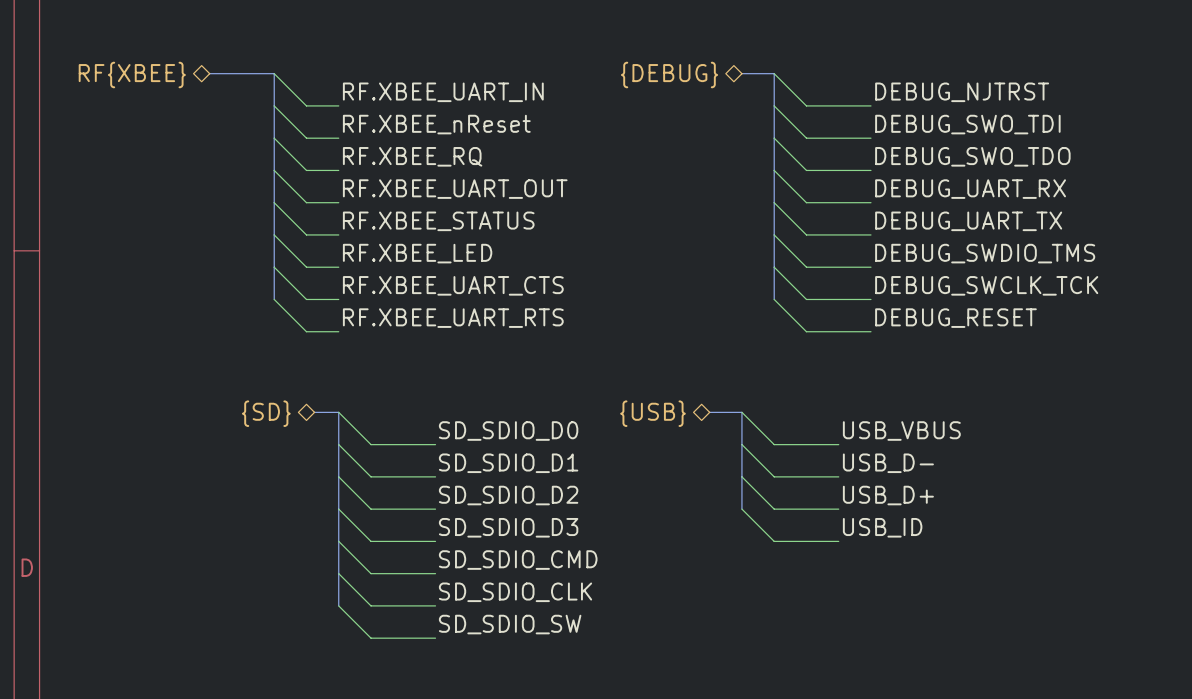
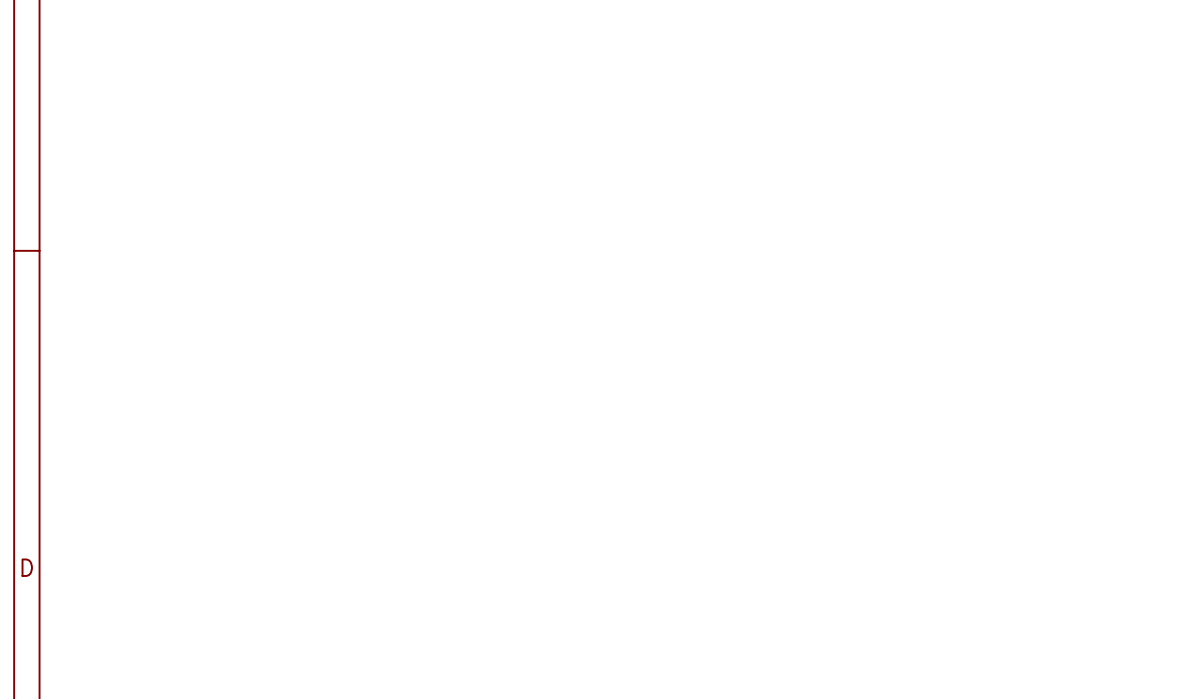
bus: (209, 73) (274, 73) (274, 299) -> none
wire: (274, 73) (306, 105) (338, 105) -> none
bus: (741, 73) (774, 73) (774, 299) -> none
wire: (774, 73) (806, 105) (870, 105) -> none
hierarchical label: RF{XBEE} (132, 74) -> none
hierarchical label: {DEBUG} (669, 74) -> none
label: RF.XBEE_UART_IN (443, 92) -> none
label: DEBUG_NJTRST (962, 92) -> none
wire: (274, 105) (306, 138) (338, 138) -> none
wire: (774, 105) (806, 138) (870, 138) -> none
label: RF.XBEE_nReset (436, 124) -> none
label: DEBUG_SWO_TDI (967, 124) -> none
wire: (274, 138) (306, 170) (338, 170) -> none
wire: (774, 138) (806, 170) (870, 170) -> none
label: RF.XBEE_RQ (412, 156) -> none
label: DEBUG_SWO_TDO (972, 156) -> none
wire: (274, 170) (306, 202) (338, 202) -> none
wire: (774, 170) (806, 202) (870, 202) -> none
label: RF.XBEE_UART_OUT (455, 189) -> none
label: DEBUG_UART_RX (970, 189) -> none
wire: (274, 202) (306, 234) (338, 234) -> none
wire: (774, 202) (806, 234) (870, 234) -> none
label: RF.XBEE_STATUS (438, 221) -> none
label: DEBUG_UART_TX (968, 221) -> none
wire: (274, 234) (306, 267) (338, 267) -> none
wire: (774, 234) (806, 267) (870, 267) -> none
label: RF.XBEE_LED (417, 253) -> none
label: DEBUG_SWDIO_TMS (985, 253) -> none
wire: (274, 267) (306, 299) (338, 299) -> none
wire: (774, 267) (806, 299) (870, 299) -> none
label: RF.XBEE_UART_CTS (453, 285) -> none
label: DEBUG_SWCLK_TCK (986, 285) -> none
wire: (274, 299) (306, 331) (338, 331) -> none
wire: (774, 299) (806, 331) (870, 331) -> none
label: RF.XBEE_UART_RTS (453, 318) -> none
label: DEBUG_RESET (955, 318) -> none
bus: (314, 412) (338, 412) (338, 605) -> none
wire: (338, 412) (371, 444) (435, 444) -> none
bus: (709, 412) (741, 412) (741, 509) -> none
wire: (741, 412) (774, 444) (838, 444) -> none
hierarchical label: {SD} (266, 413) -> none
hierarchical label: {USB} (653, 413) -> none
label: SD_SDIO_D0 (508, 431) -> none
label: USB_VBUS (901, 431) -> none
wire: (338, 444) (371, 476) (435, 476) -> none
wire: (741, 444) (774, 476) (838, 476) -> none
label: SD_SDIO_D1 (508, 463) -> none
label: USB_D- (888, 463) -> none
wire: (338, 476) (371, 509) (435, 509) -> none
wire: (741, 476) (774, 509) (838, 509) -> none
label: SD_SDIO_D2 (508, 495) -> none
label: USB_D+ (888, 495) -> none
wire: (338, 509) (371, 541) (435, 541) -> none
wire: (741, 509) (774, 541) (838, 541) -> none
label: SD_SDIO_D3 (508, 527) -> none
label: USB_ID (882, 527) -> none
wire: (338, 541) (371, 573) (435, 573) -> none
label: SD_SDIO_CMD (518, 560) -> none
wire: (338, 573) (371, 605) (435, 605) -> none
label: SD_SDIO_CLK (515, 592) -> none
wire: (338, 605) (371, 638) (435, 638) -> none
label: SD_SDIO_SW (510, 624) -> none

